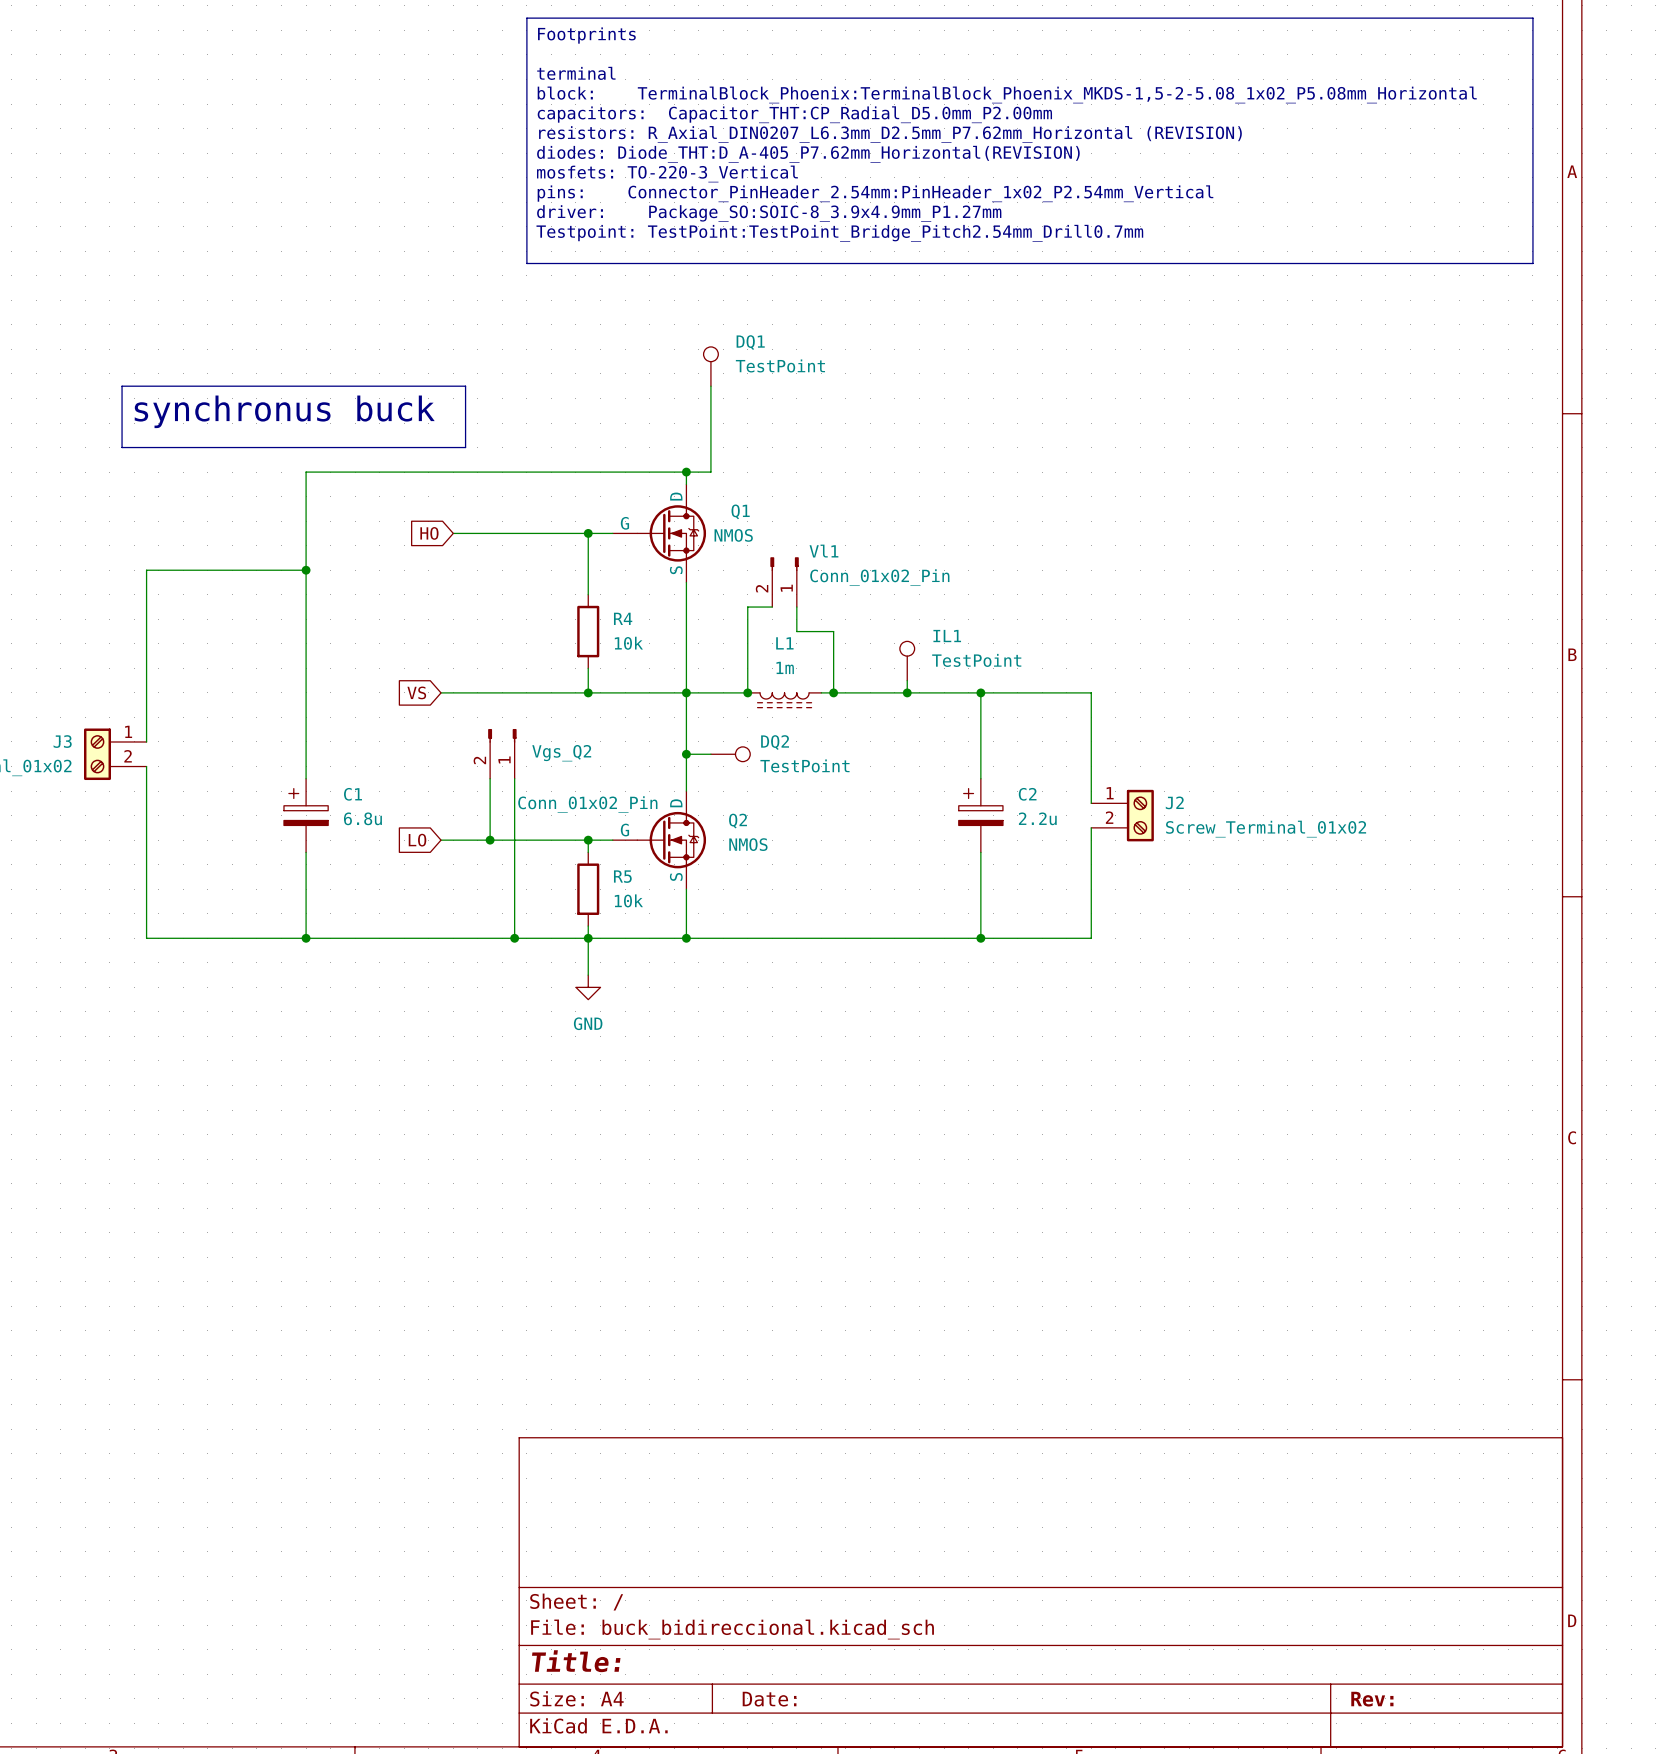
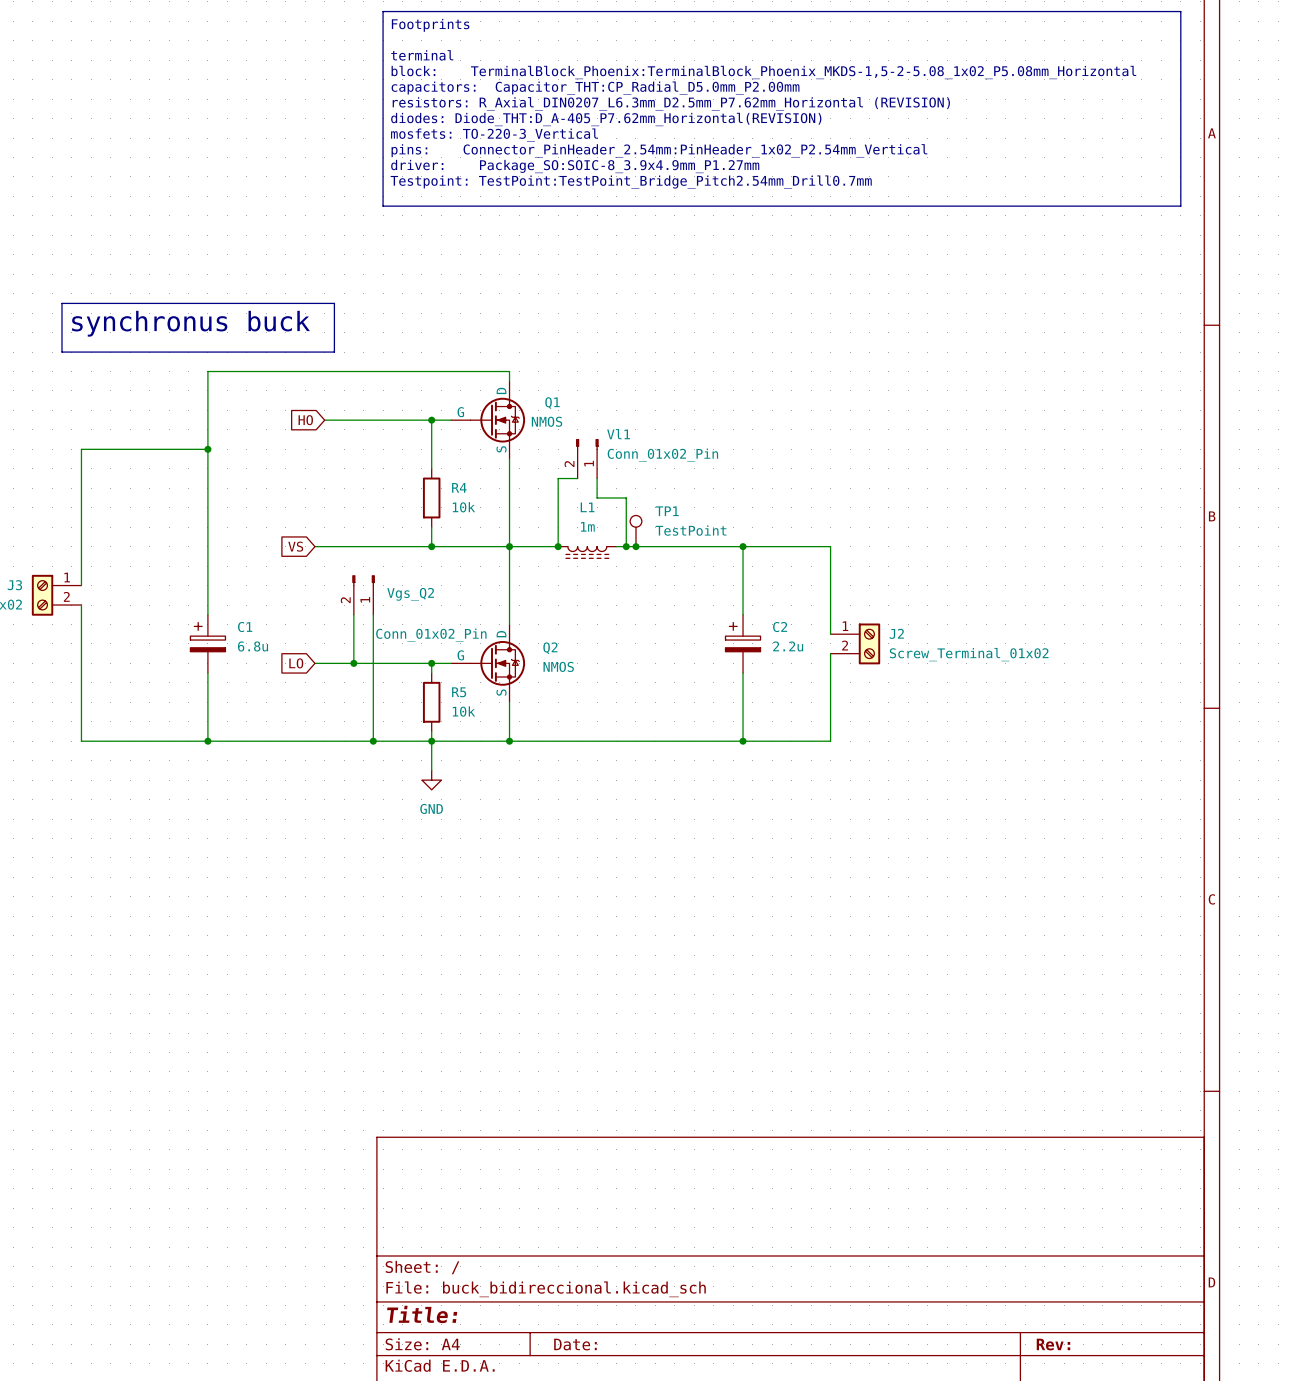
DQ1: TestPoint (710, 366) -> none
wire: (710, 386) (710, 472) (686, 472) -> none
junction: (686, 472) -> none
IL1: TestPoint (907, 661) -> none
TP1: none -> TestPoint (635, 531)
wire: (907, 680) (907, 692) -> none
junction: none -> (635, 546)
junction: (907, 692) -> none
wire: (686, 754) (710, 754) -> none
junction: (686, 754) -> none
DQ2: TestPoint (730, 754) -> none

